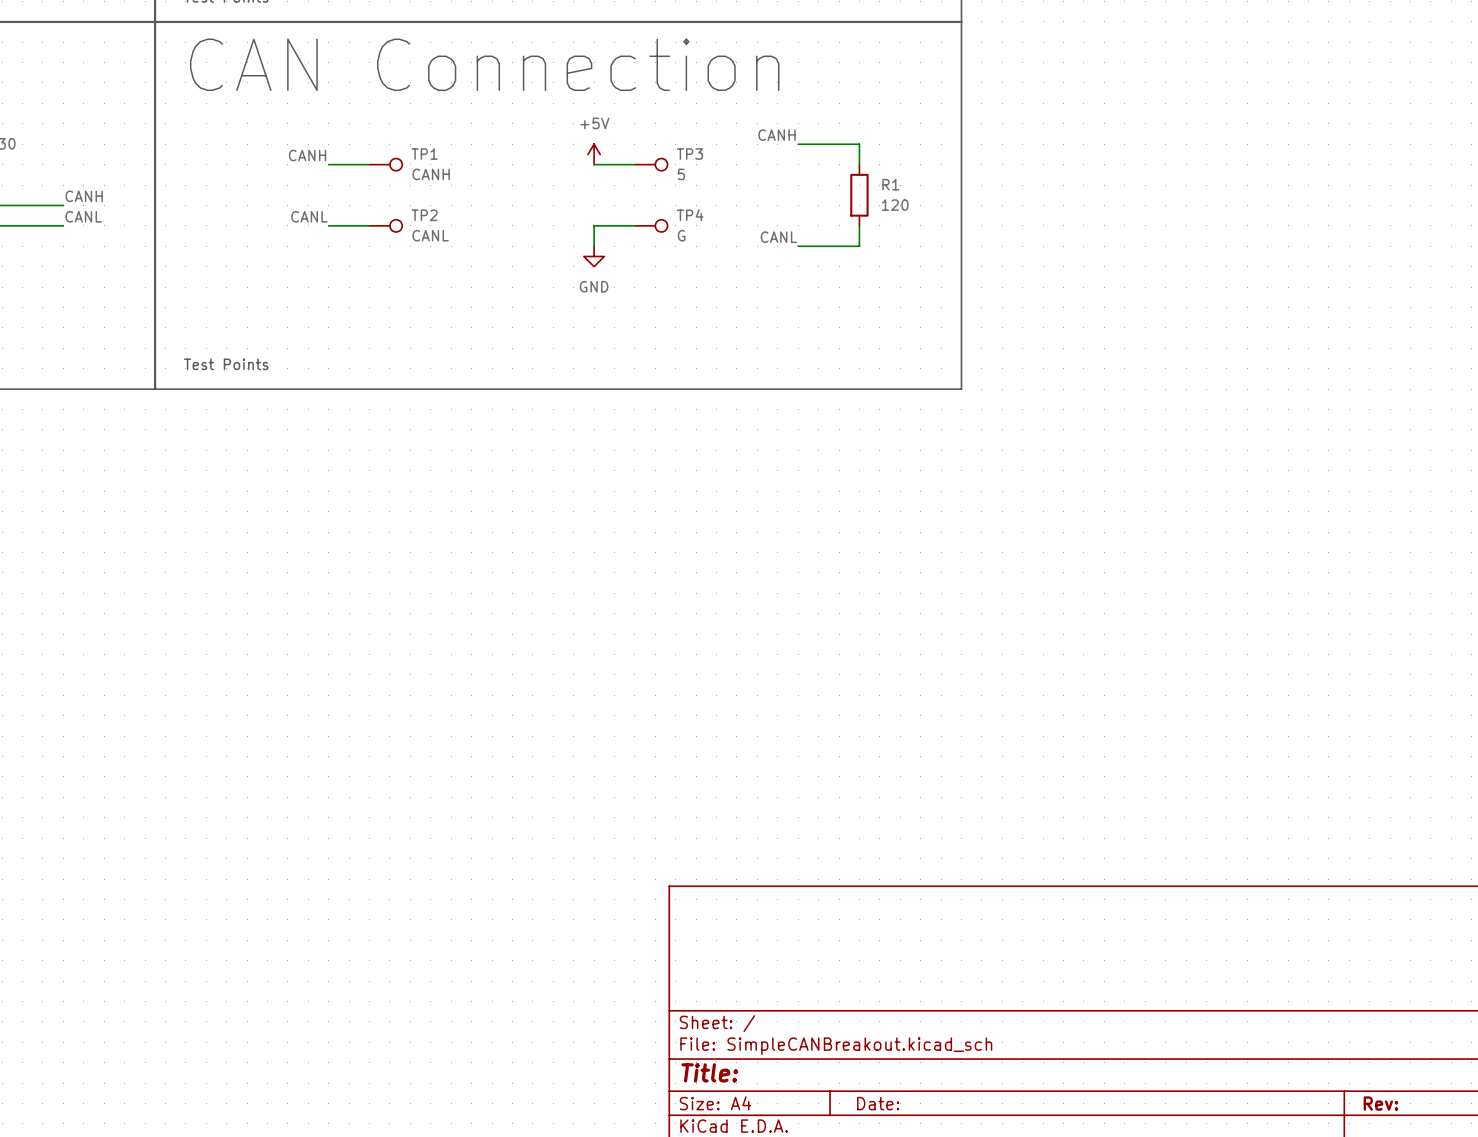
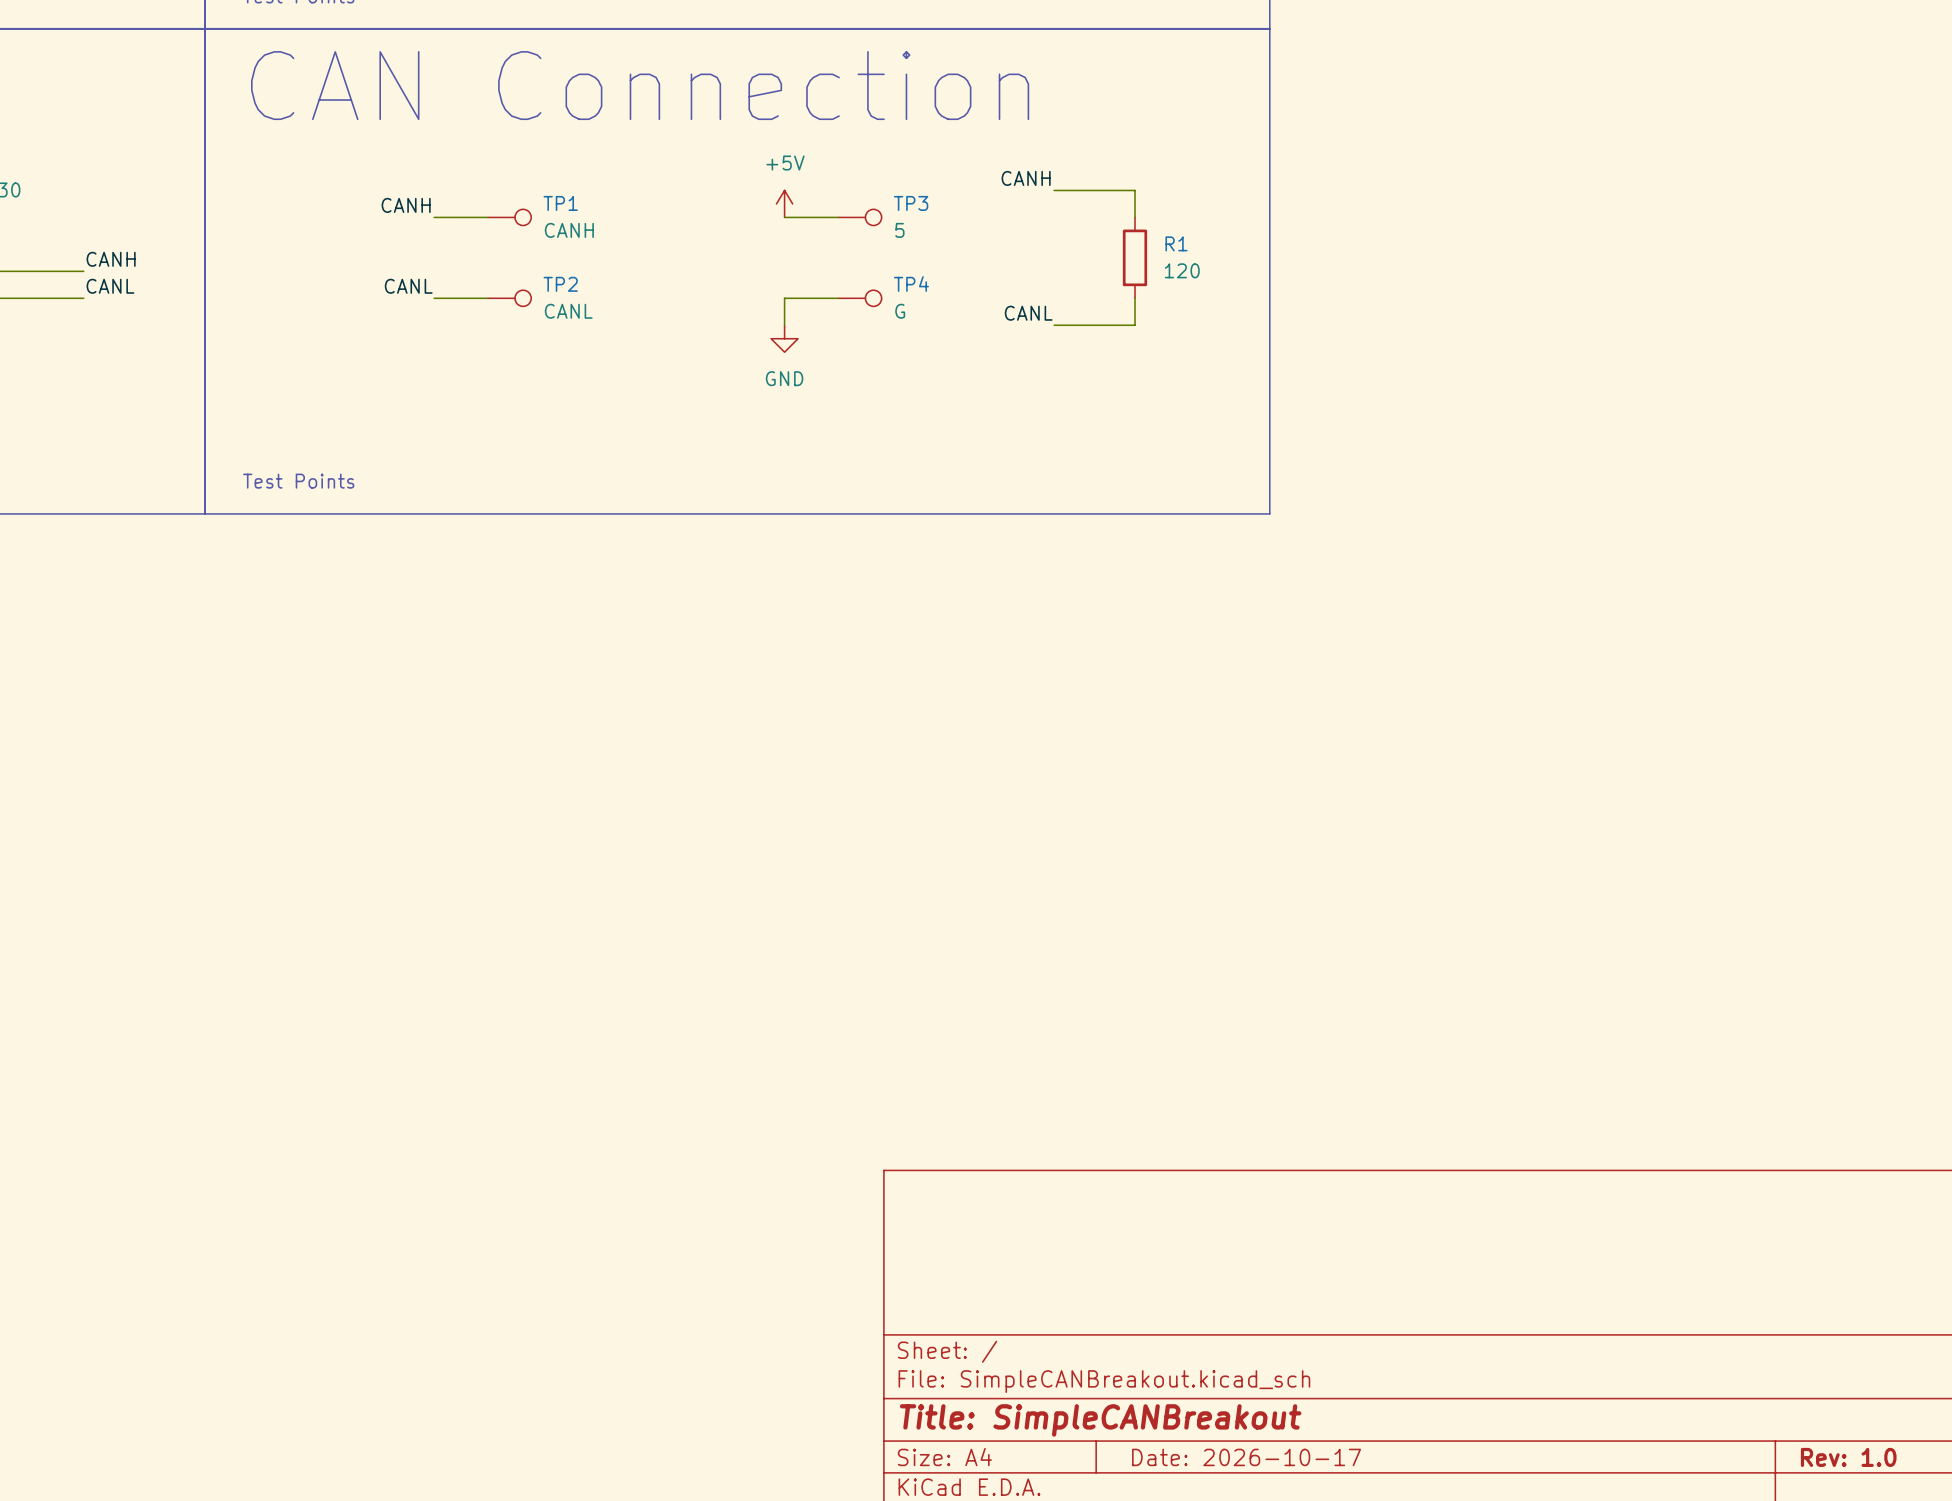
title block: Title: (709, 1072) -> Title: SimpleCANBreakout (1100, 1420)
title block: Date: (878, 1103) -> Date: 2026-10-17 (1246, 1457)
title block: Rev: (1380, 1103) -> Rev: 1.0 (1848, 1457)

